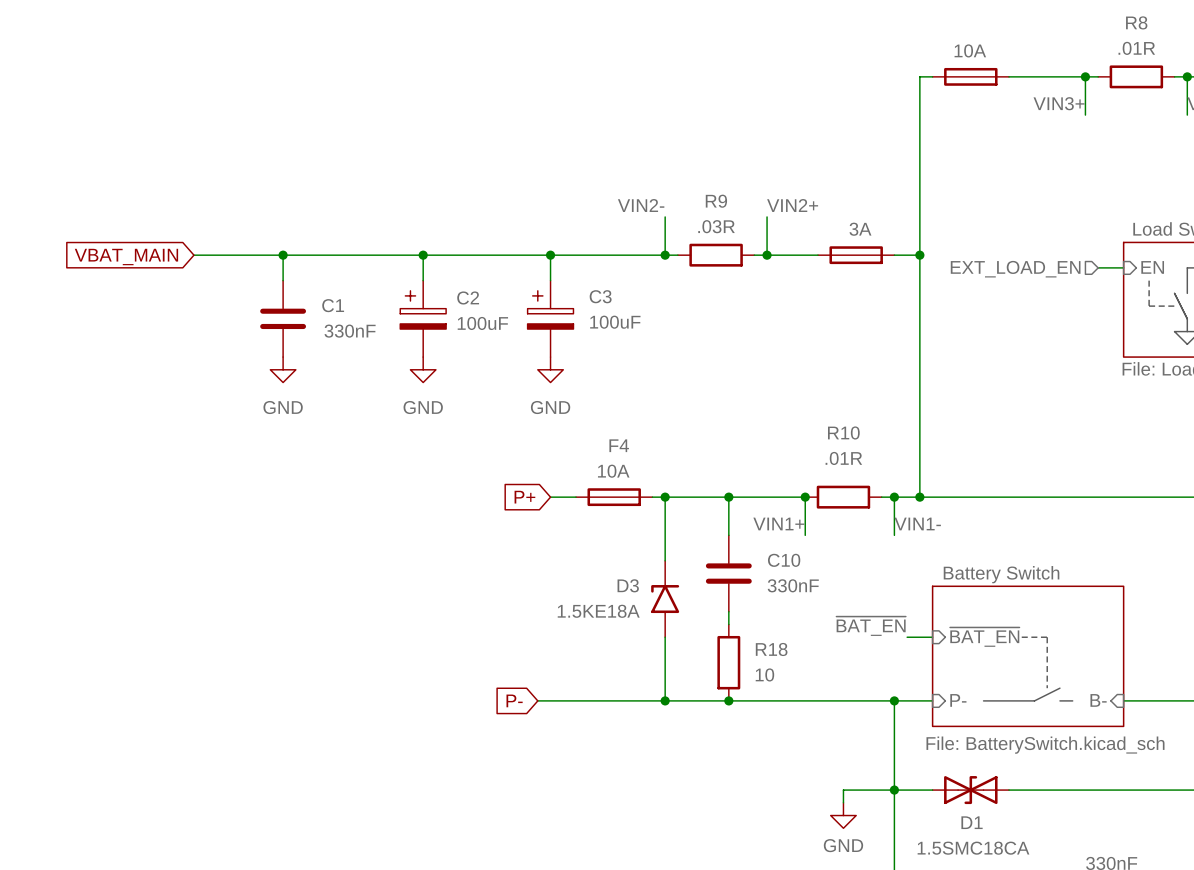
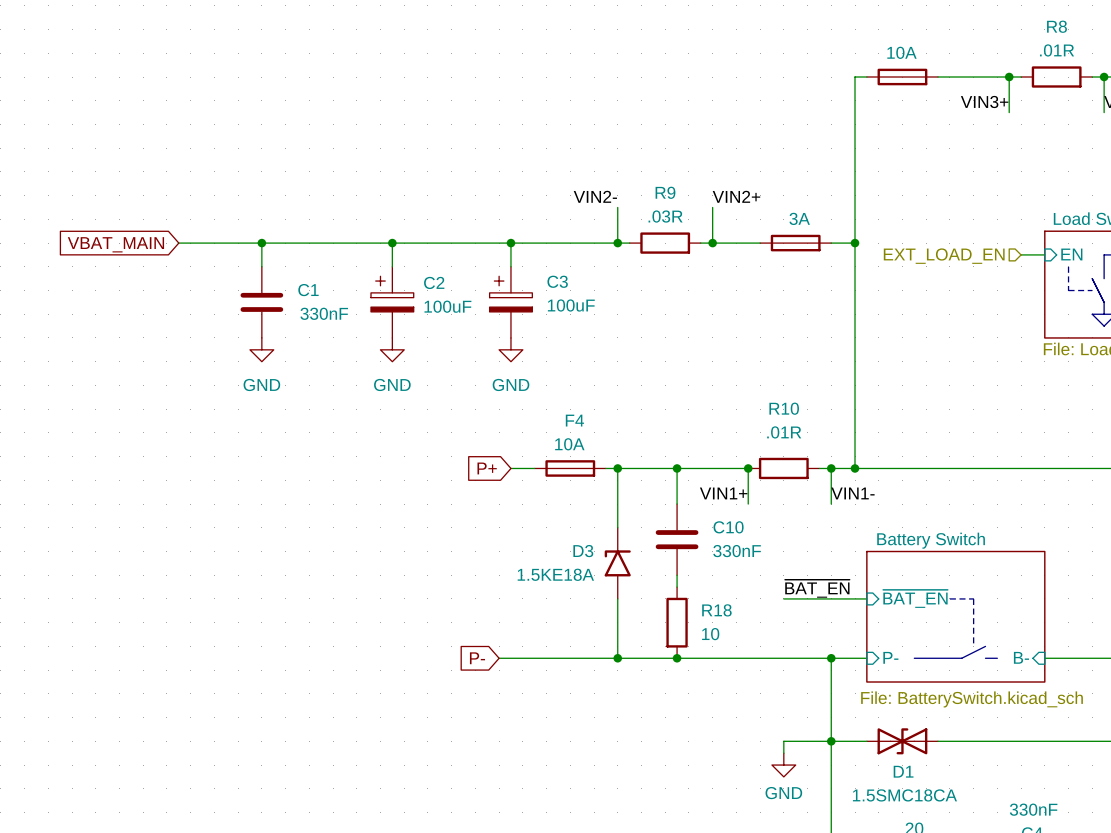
label position: ~{BAT_EN} (871, 626) -> ~{BAT_EN} (817, 588)
wire: none -> (783, 598) (843, 598)

